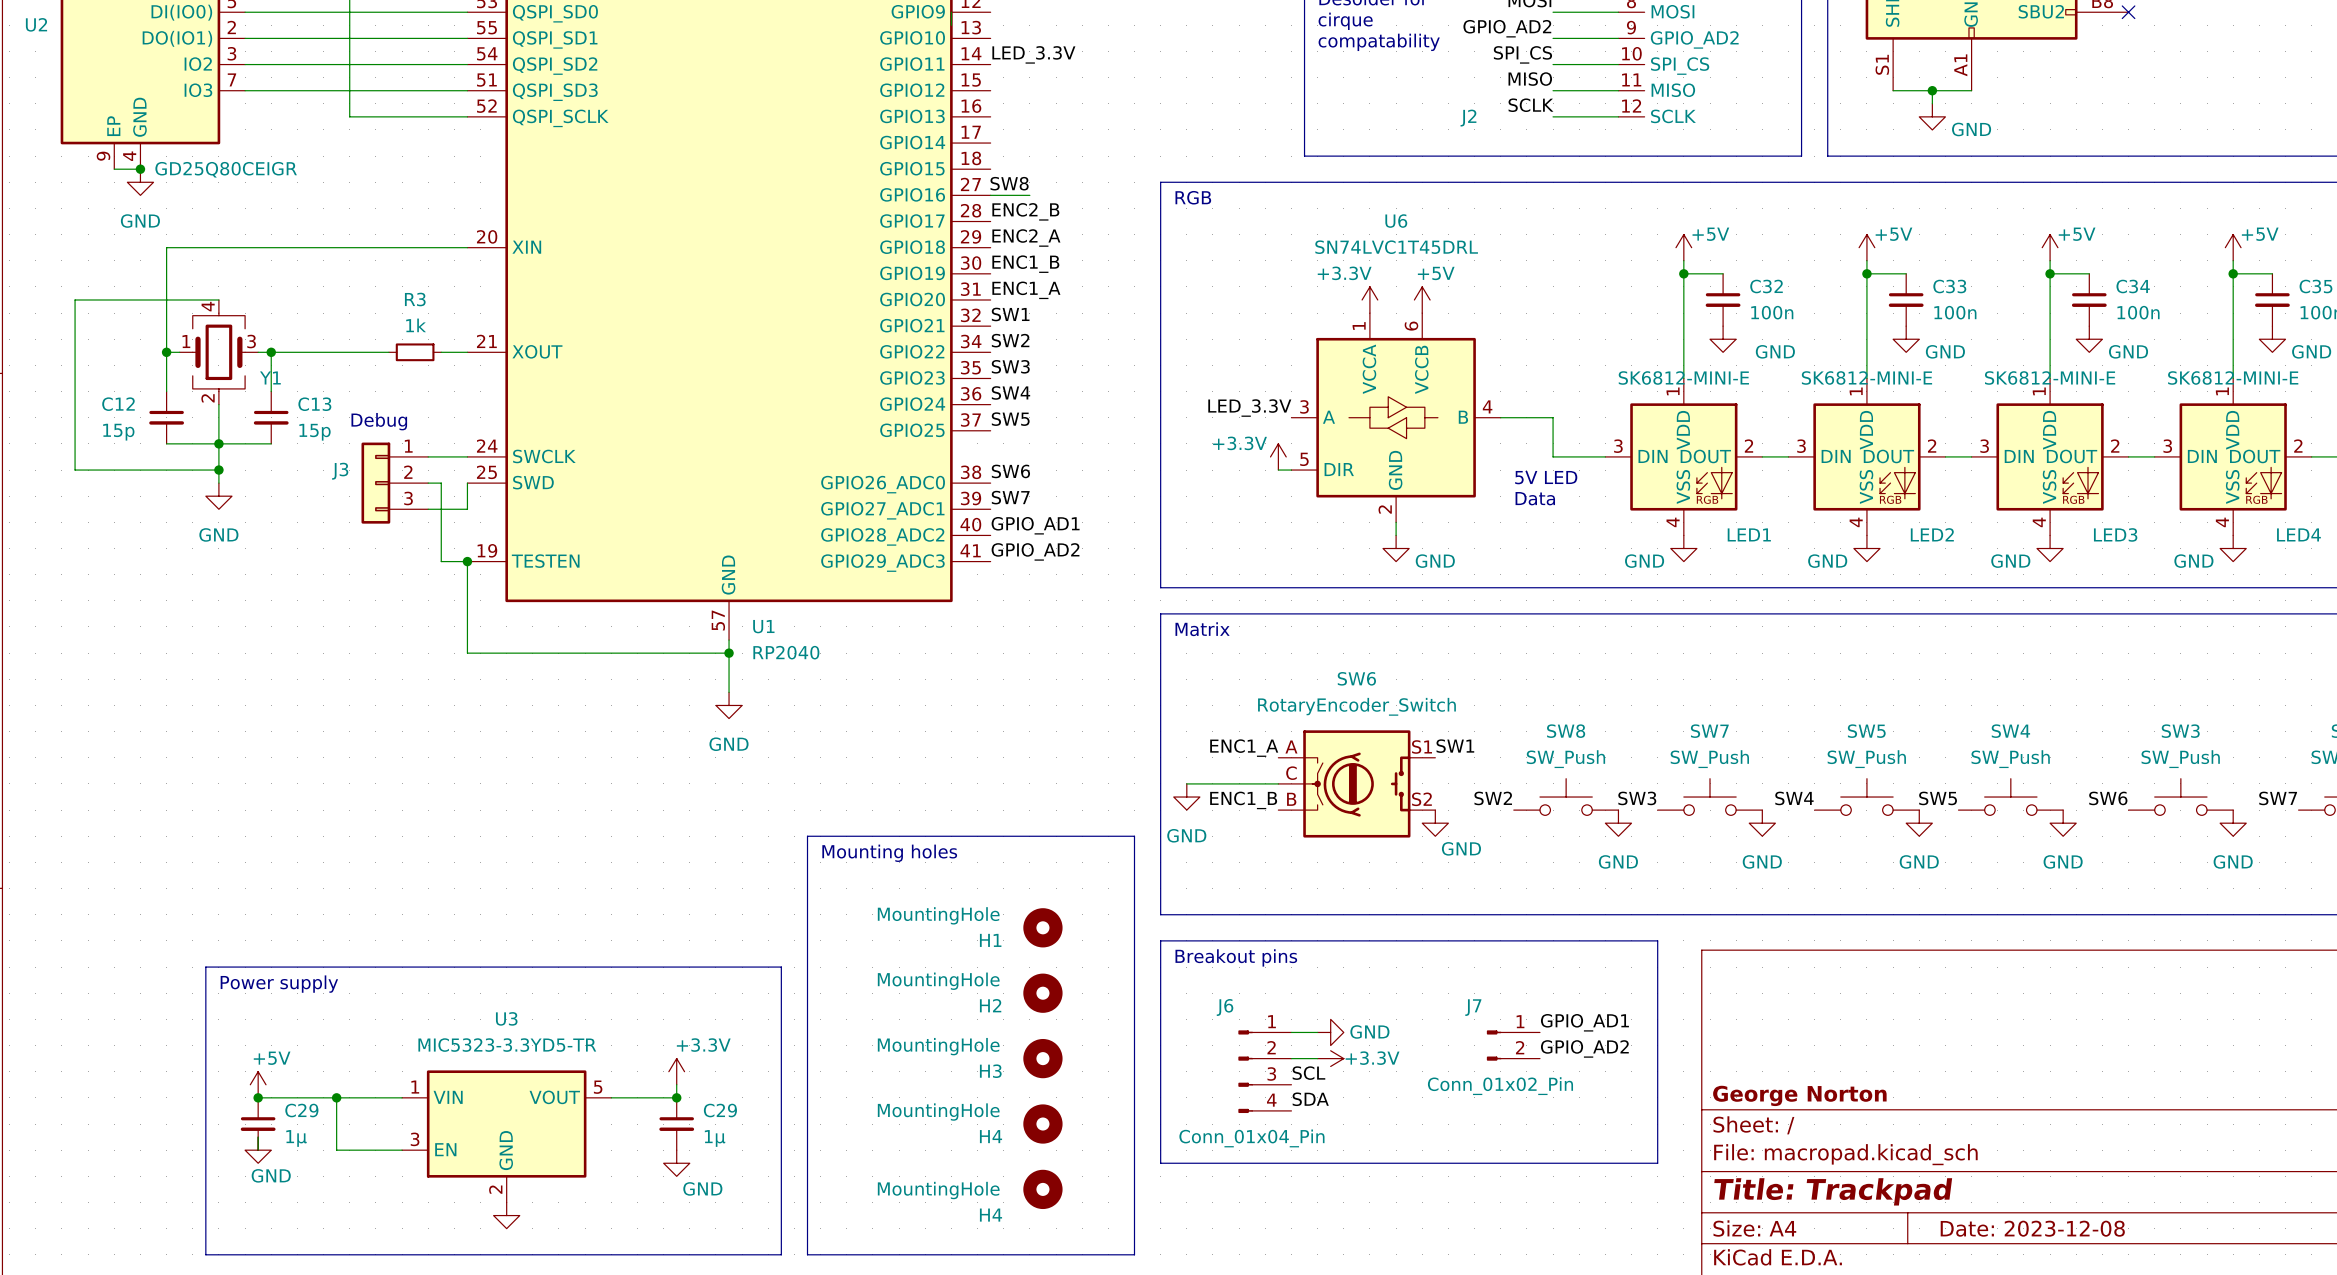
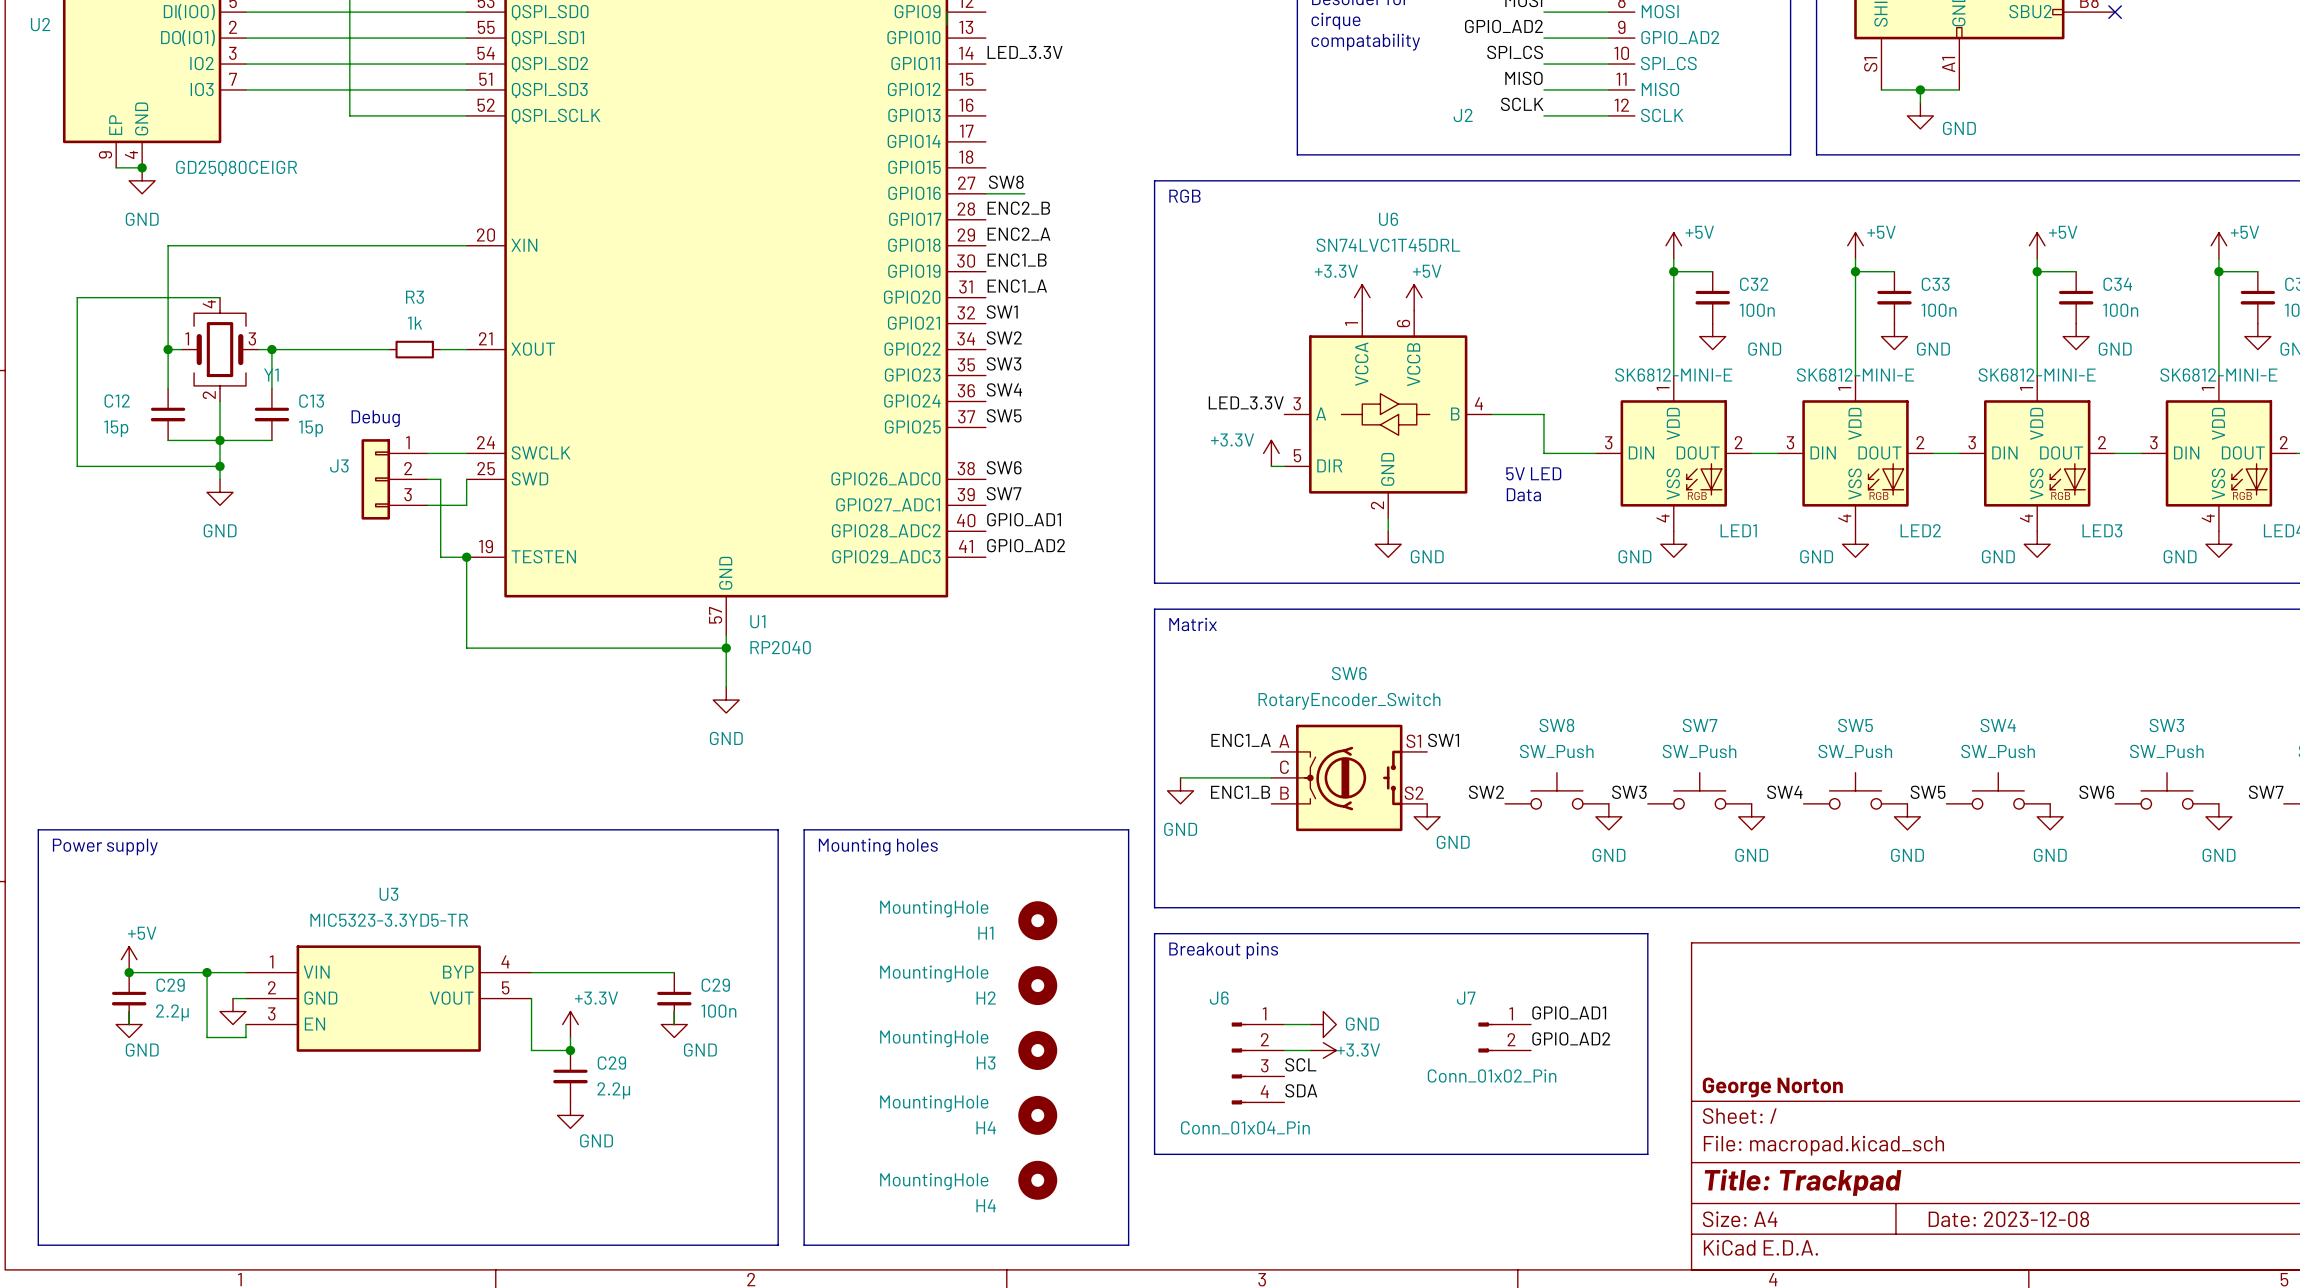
line: (781, 967) (205, 967) (205, 1254) -> (778, 959) (778, 829) (38, 829) (38, 1245) (207, 1245)
wire: none -> (129, 972) (245, 972)
junction: none -> (129, 972)
wire: none -> (207, 972) (207, 1037) (245, 1037) (245, 1024)
junction: none -> (207, 972)
wire: none -> (531, 972) (674, 972)
text position: Power supply (279, 984) -> Power supply (105, 847)
C29: none -> 2.2µ (129, 998)
wire: none -> (232, 998) (245, 998)
wire: none -> (531, 998) (531, 1050) (570, 1050) (570, 1037)
C29: none -> 100n (674, 998)
power symbol: none -> (232, 1011)
wire: none -> (674, 1011) (674, 1024)
power symbol: none -> GND (129, 1024)
power symbol: none -> GND (674, 1024)
junction: none -> (570, 1050)
U3 symbol: [402, 1070, 612, 1203] -> [245, 945, 532, 1052]
power symbol position: +3.3V (676, 1071) -> +3.3V (570, 1024)
power symbol position: +5V (258, 1084) -> +5V (129, 959)
C29: none -> 2.2µ (570, 1076)
wire: (676, 1084) (676, 1097) (611, 1097) -> none
wire: (258, 1097) (402, 1097) -> none
junction: (258, 1097) -> none
wire: (336, 1097) (336, 1150) (402, 1150) -> none
junction: (336, 1097) -> none
junction: (676, 1097) -> none
C29: 1µ (258, 1124) -> none
power symbol: none -> GND (570, 1115)
C29: 1µ (676, 1124) -> none
wire: (258, 1137) (258, 1150) -> (129, 1011) (129, 1024)
power symbol: GND (258, 1150) -> none
power symbol: GND (676, 1163) -> none
power symbol: (506, 1215) -> none

